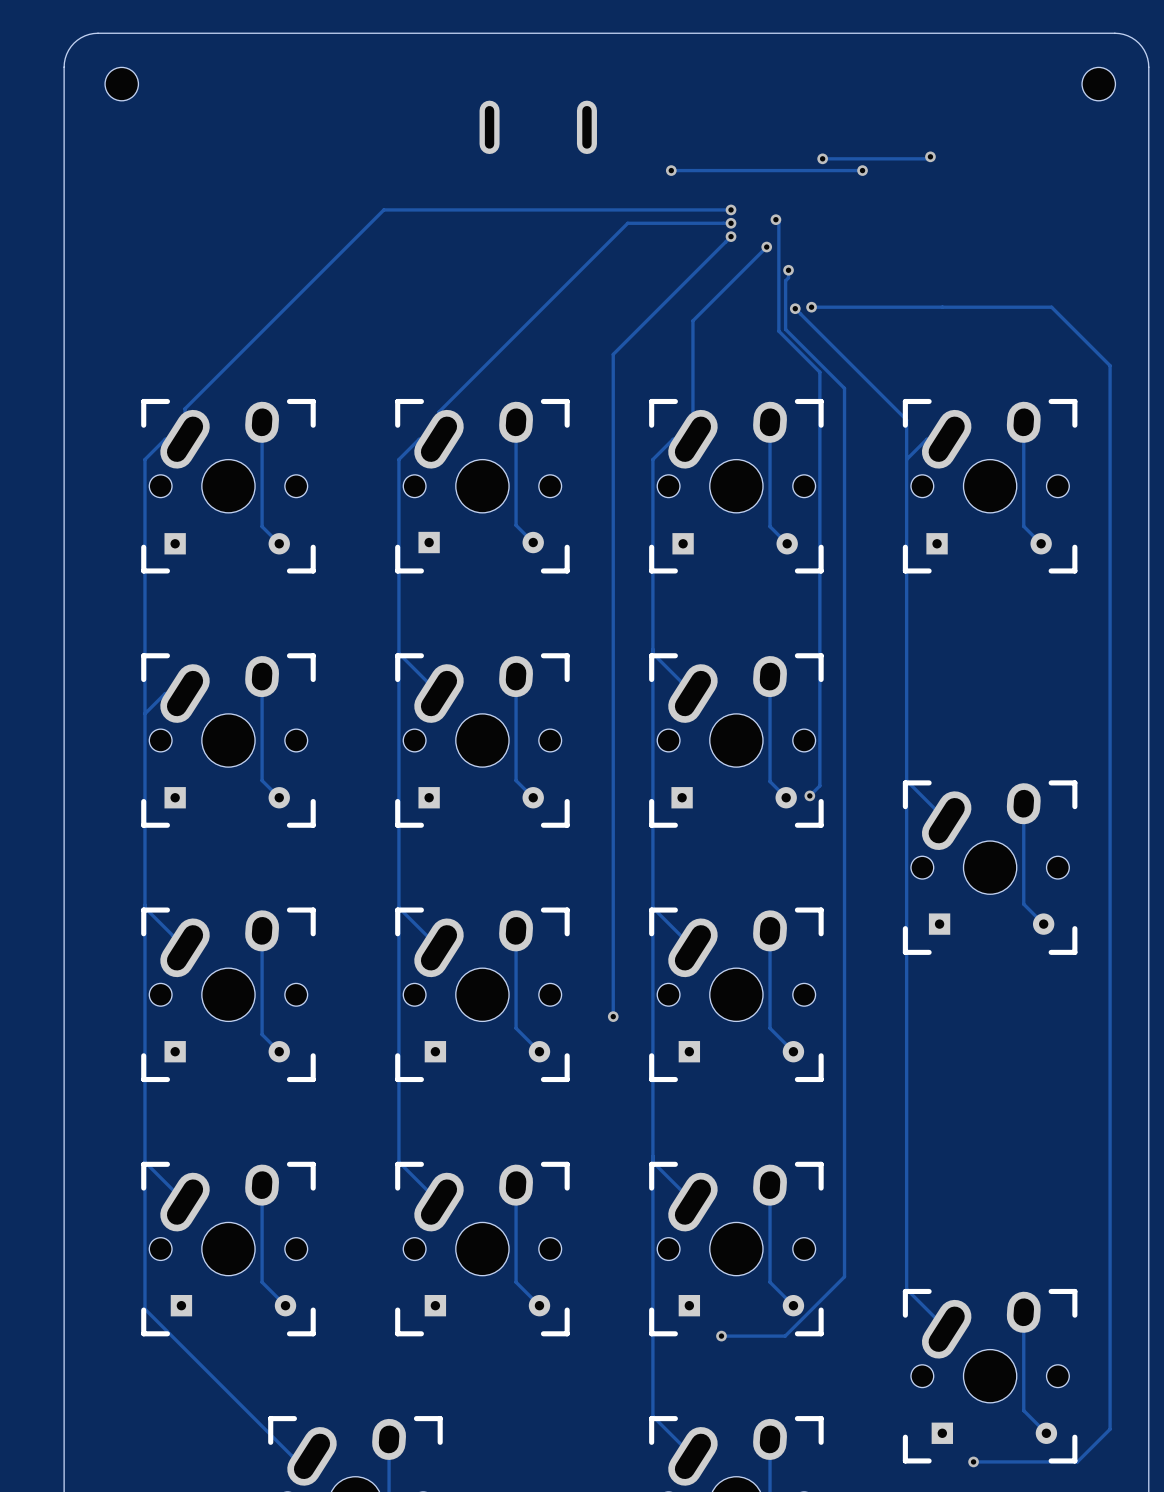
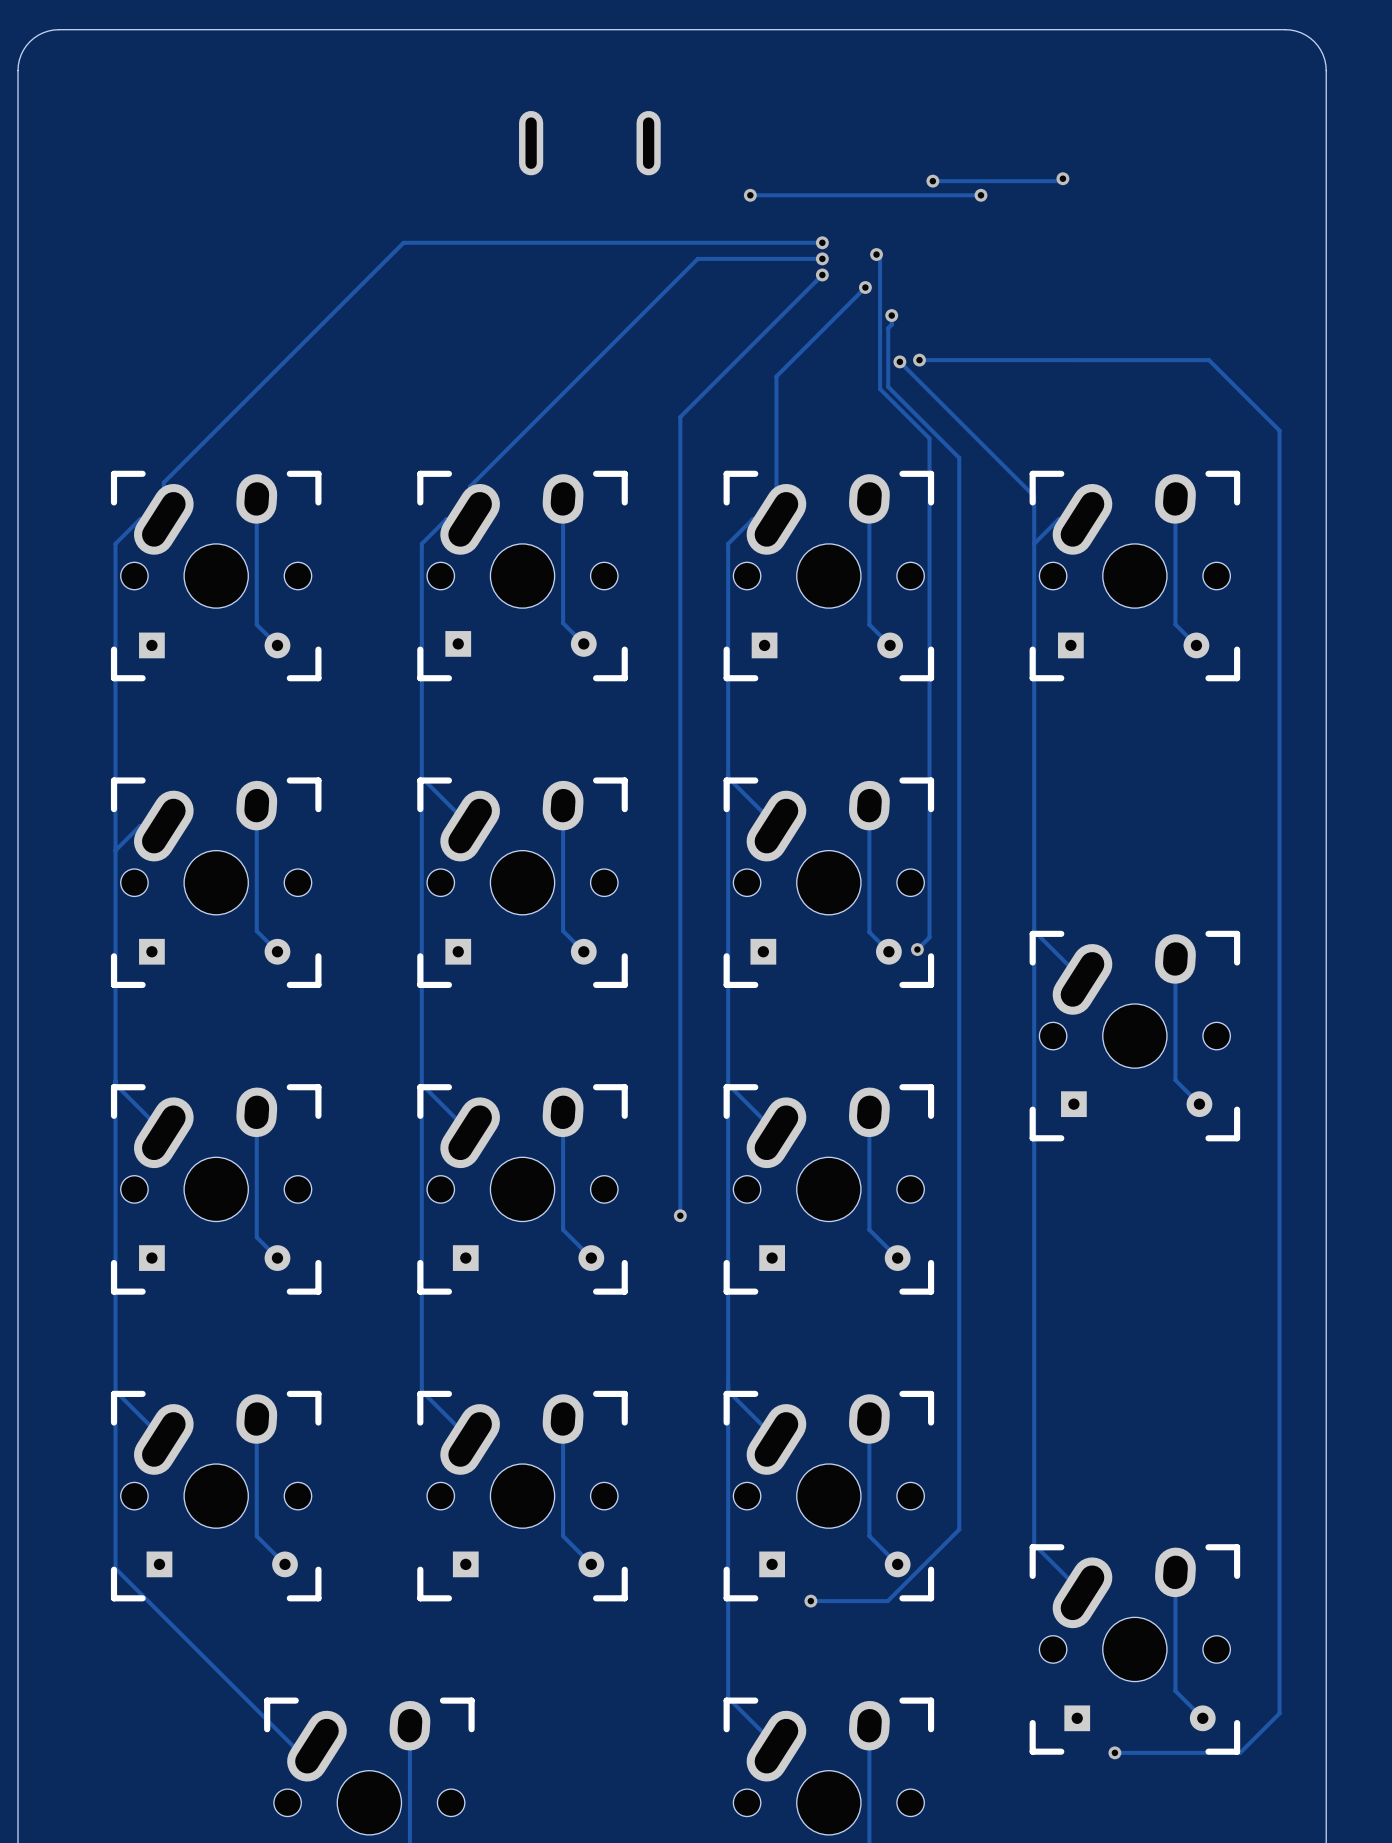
part: (121, 84) -> none
part: (1098, 84) -> none

